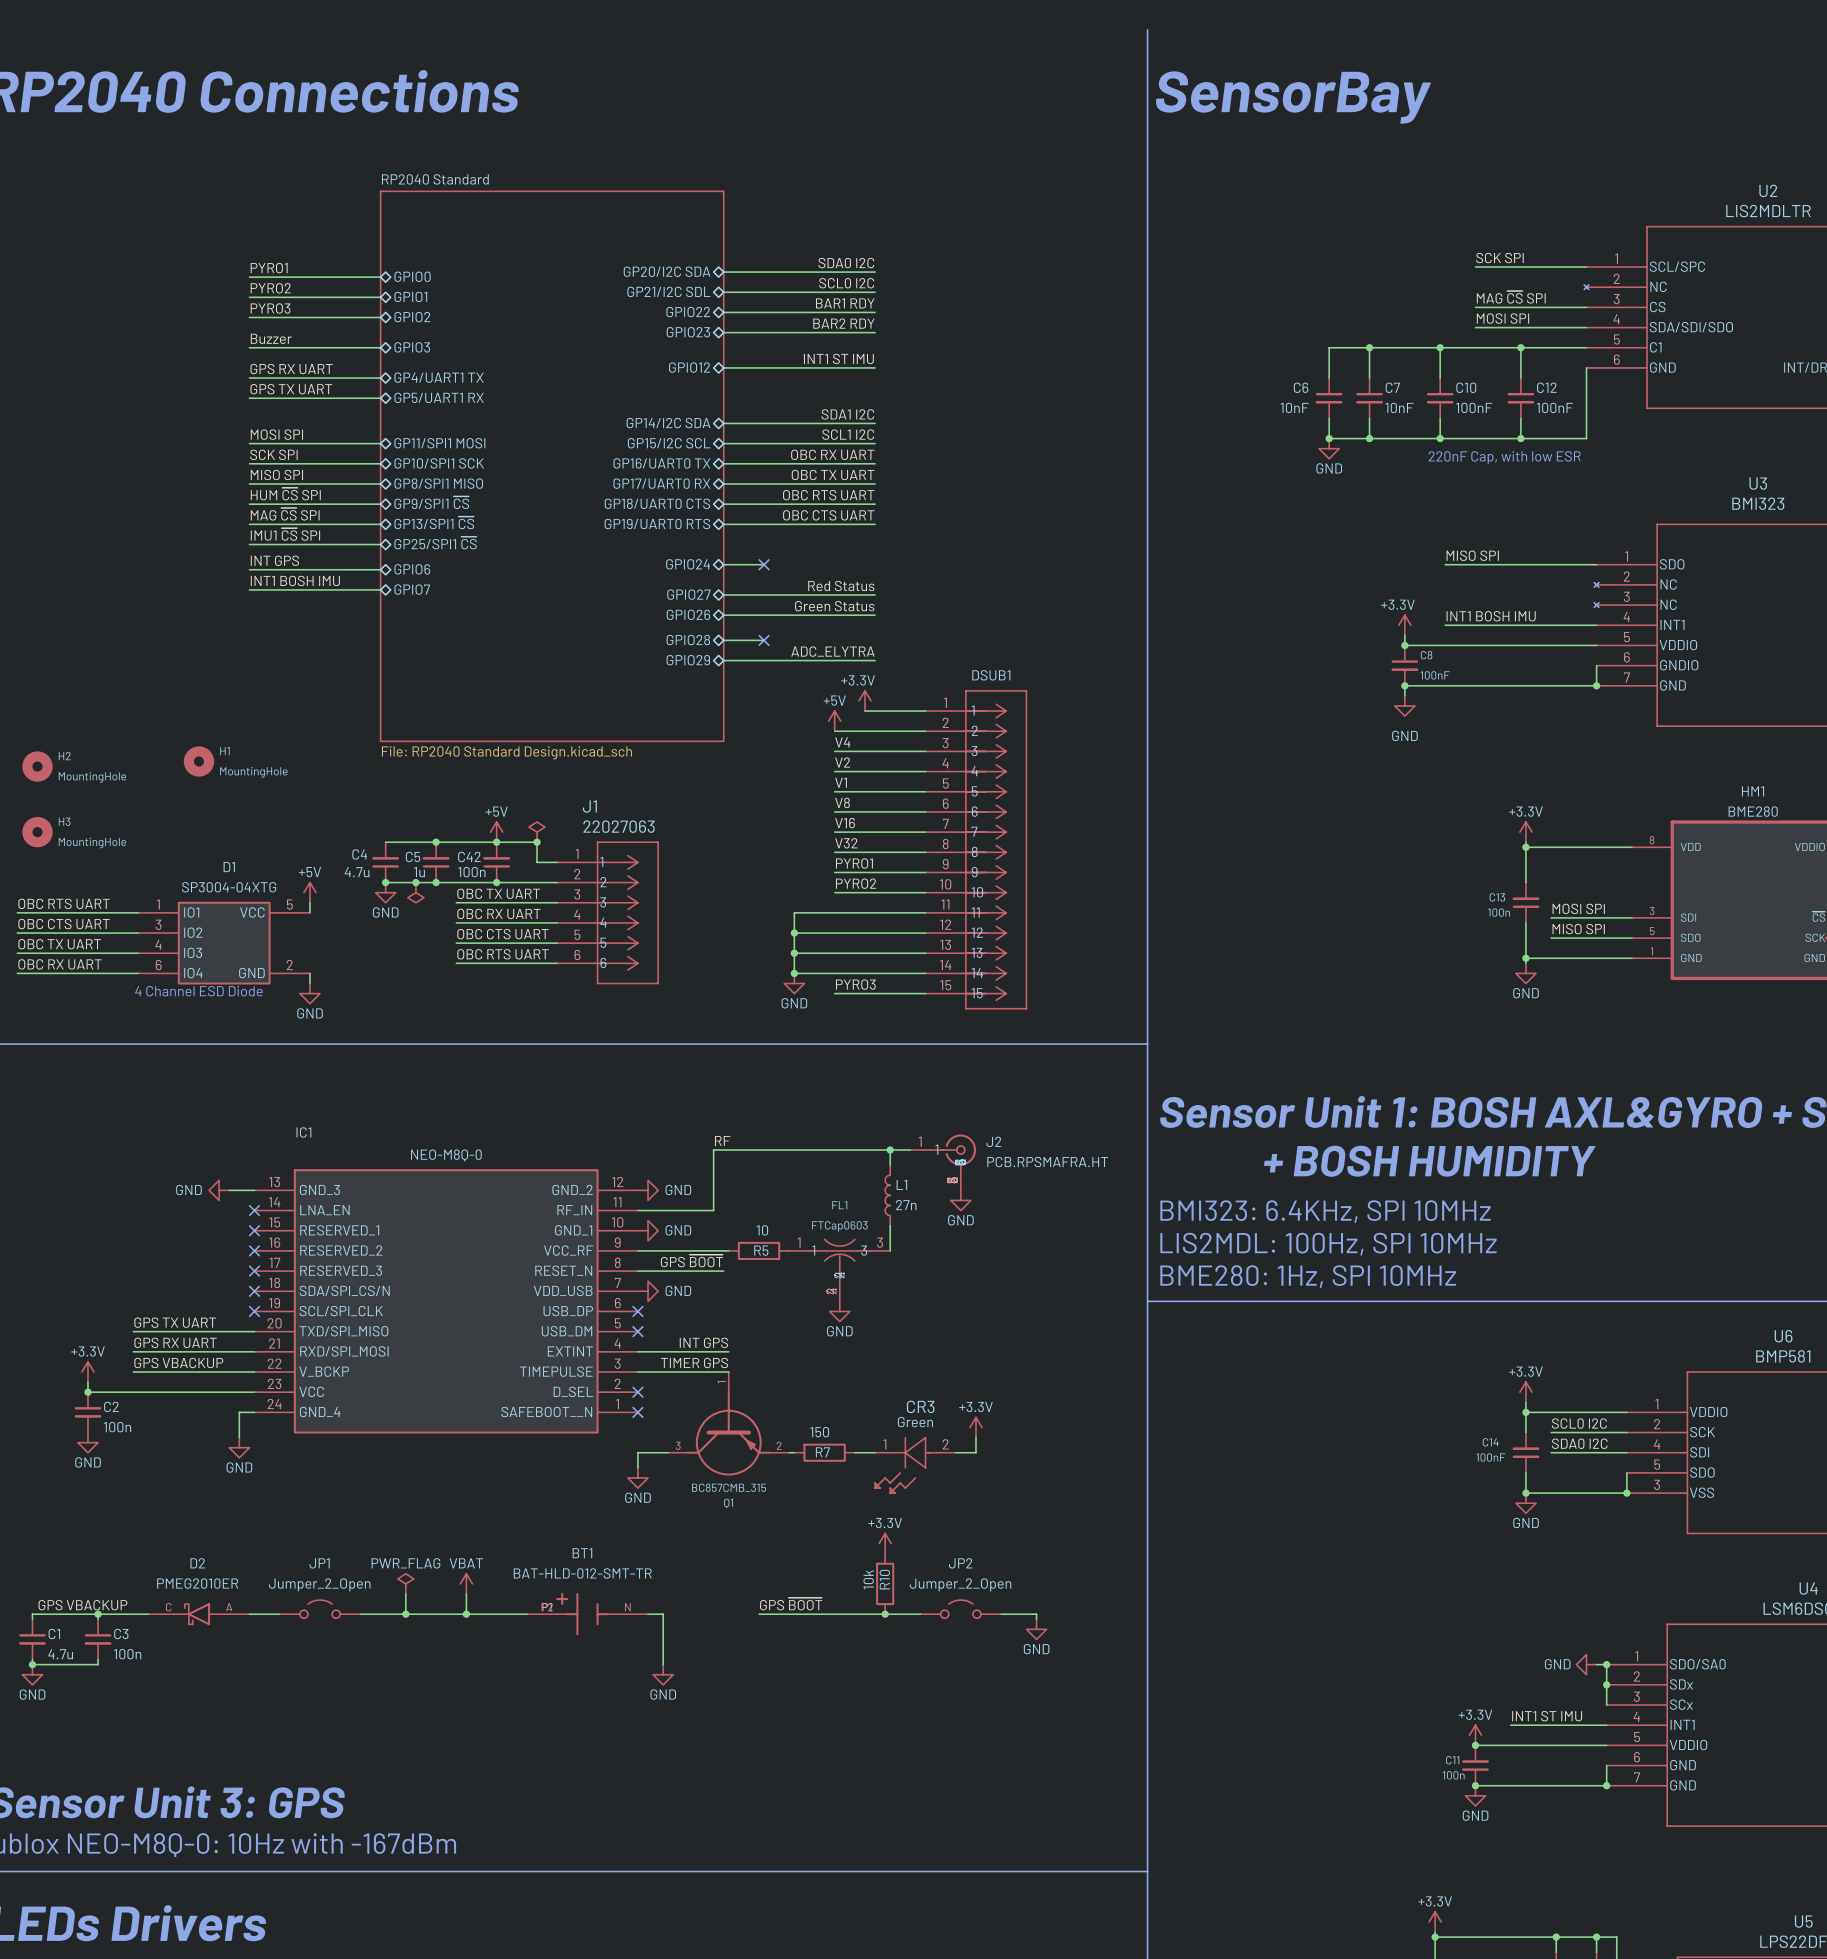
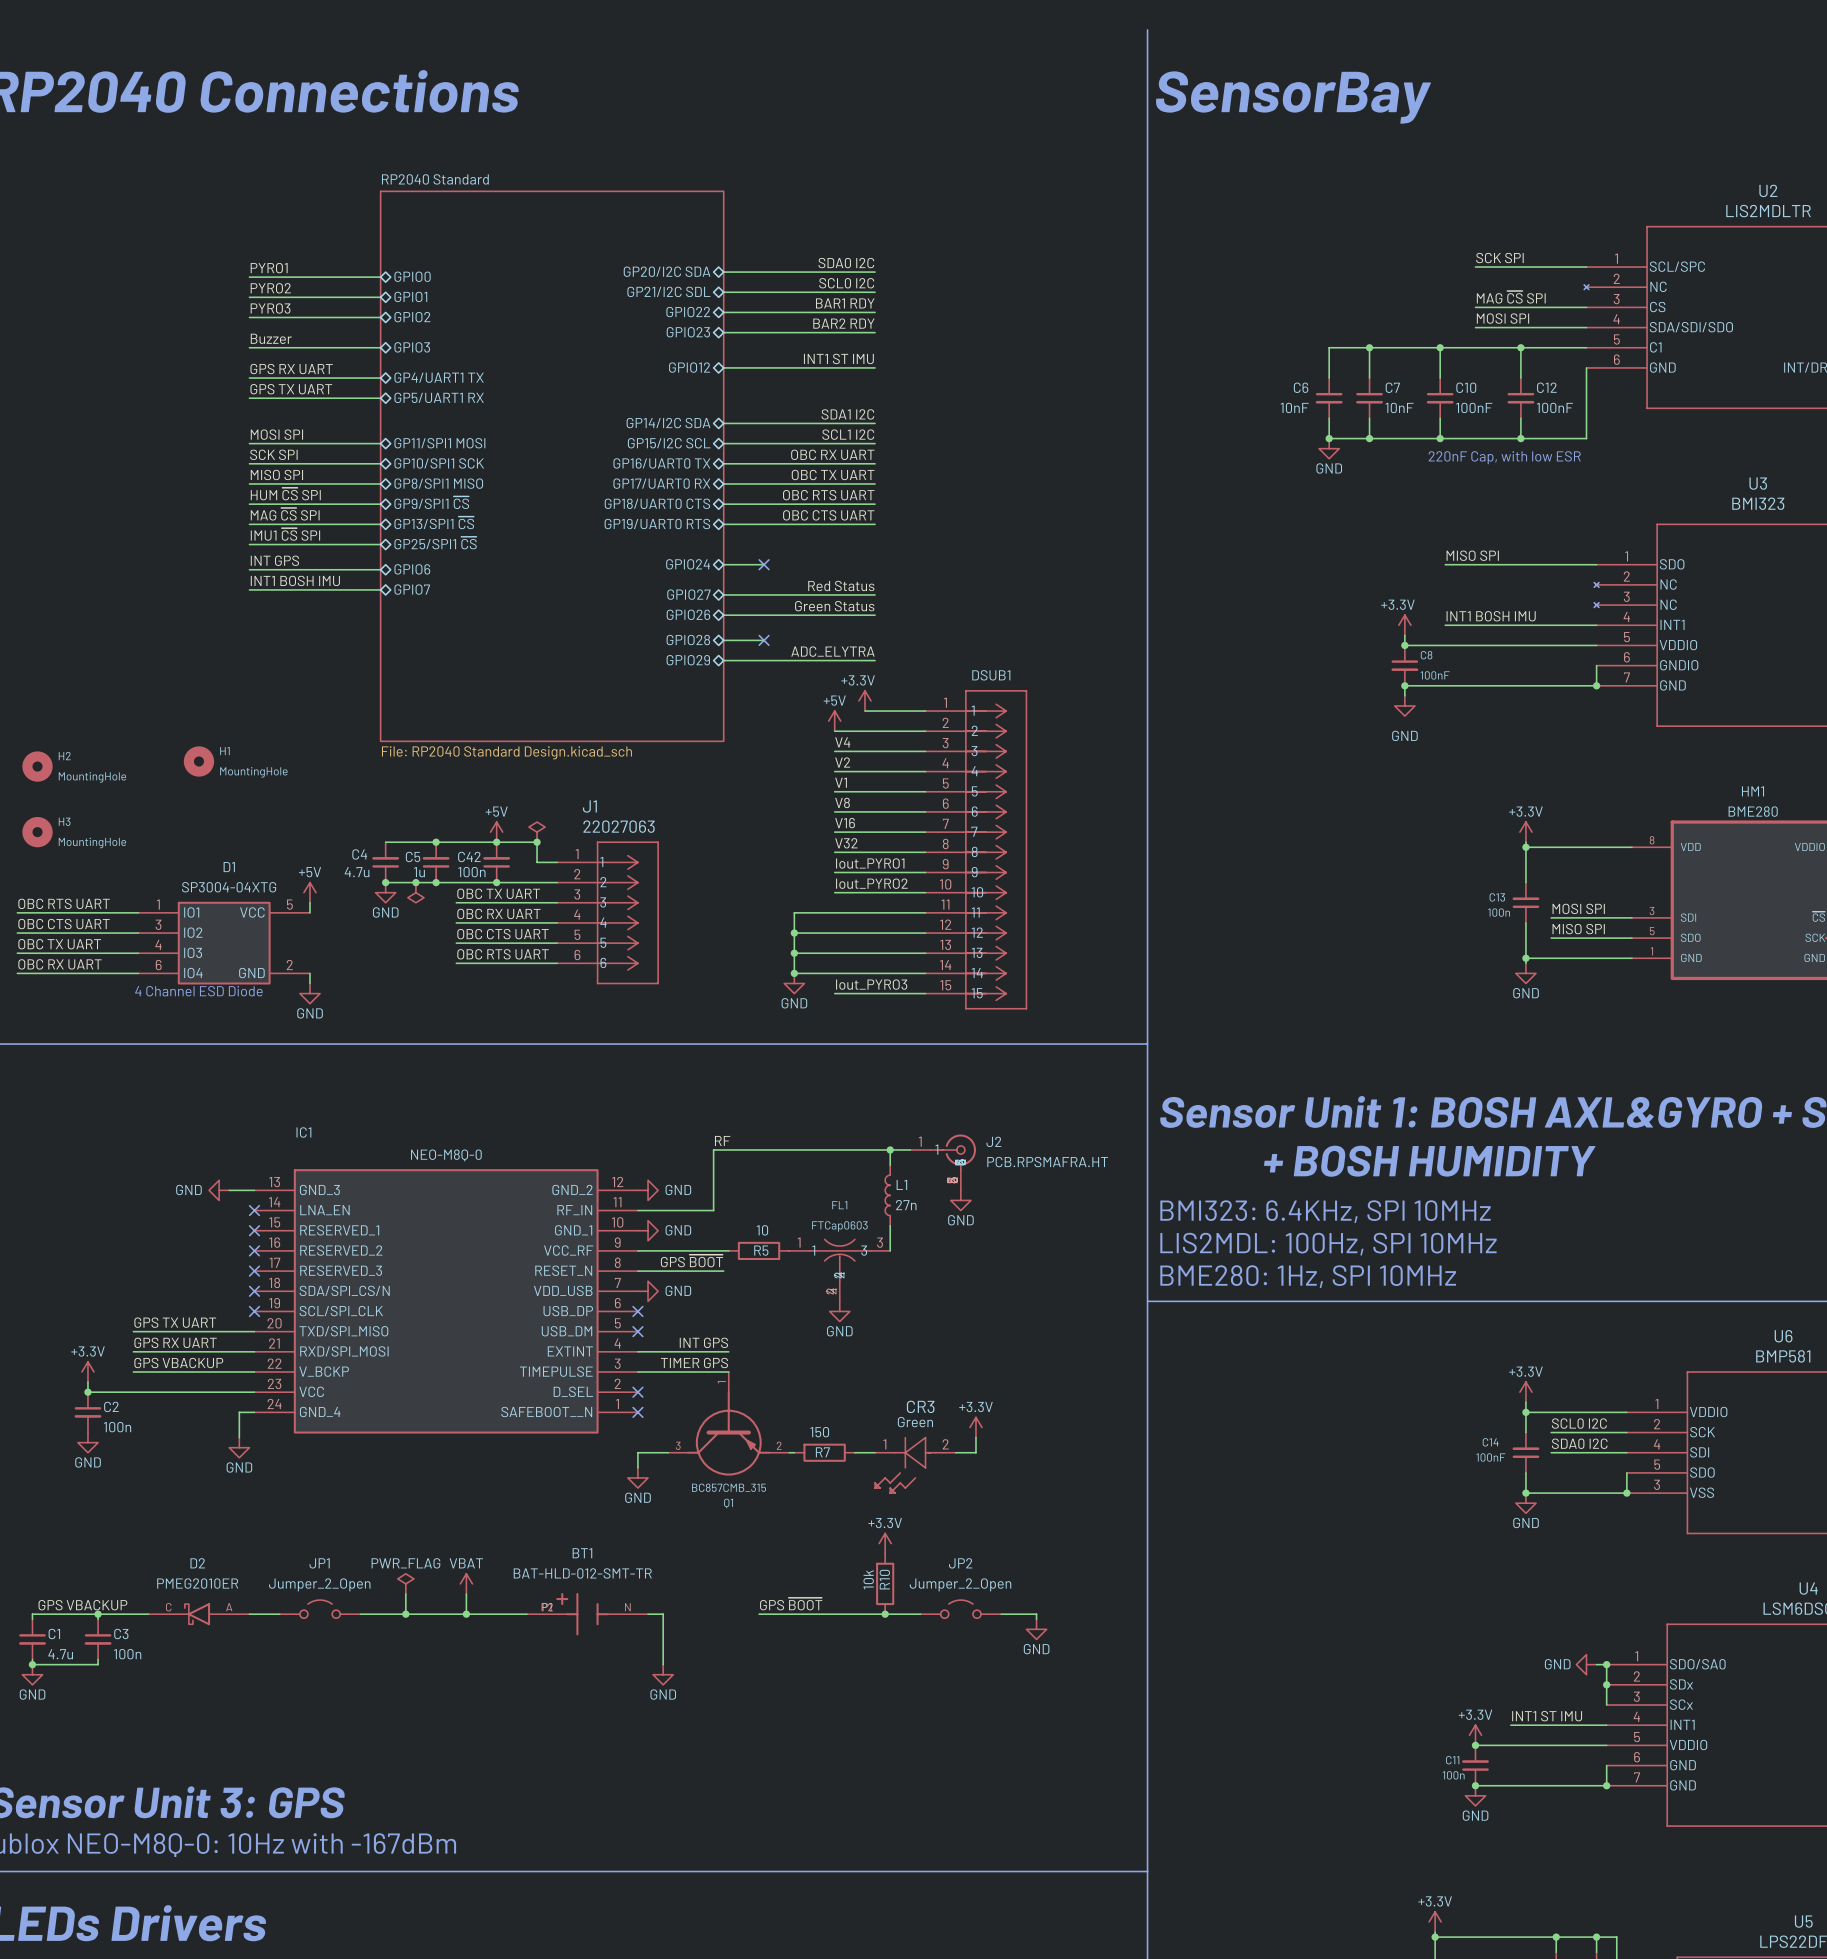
label: PYRO1 (854, 863) -> Iout_PYRO1 (870, 863)
label: PYRO2 (856, 883) -> Iout_PYRO2 (871, 883)
label: PYRO3 (855, 984) -> Iout_PYRO3 (871, 984)

